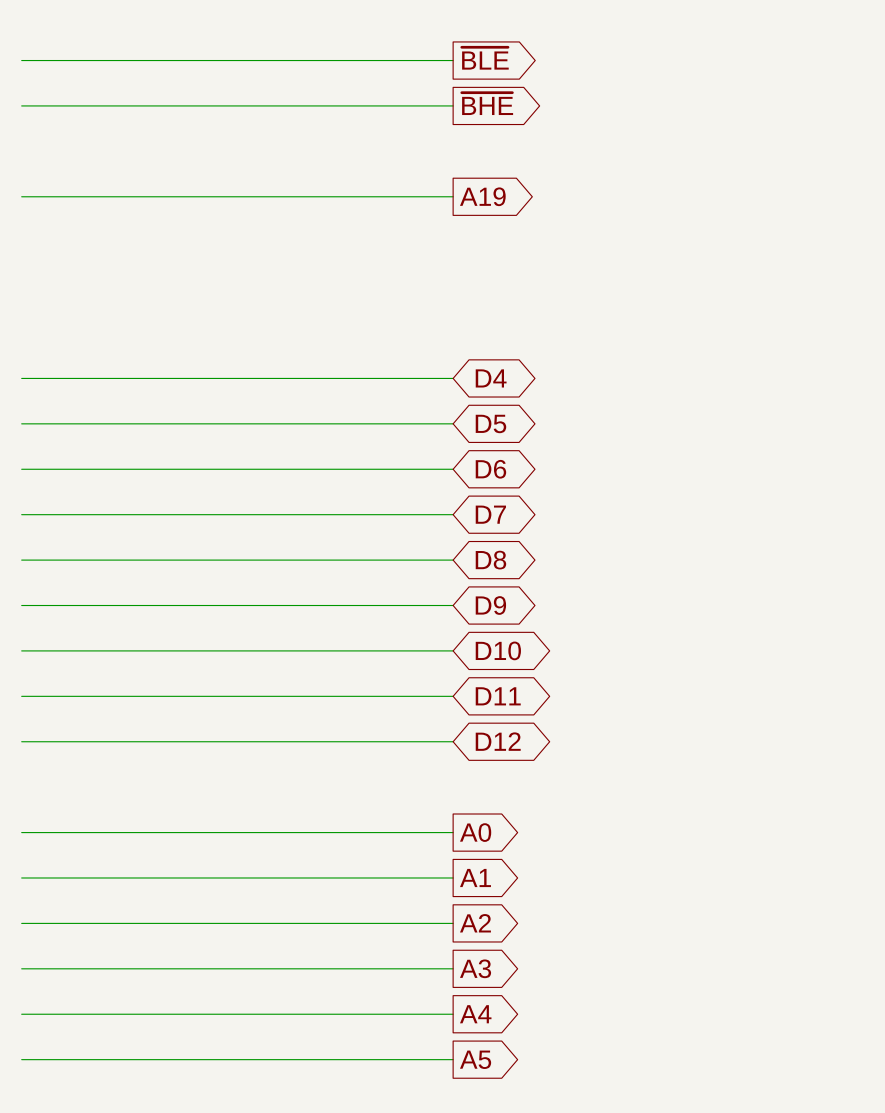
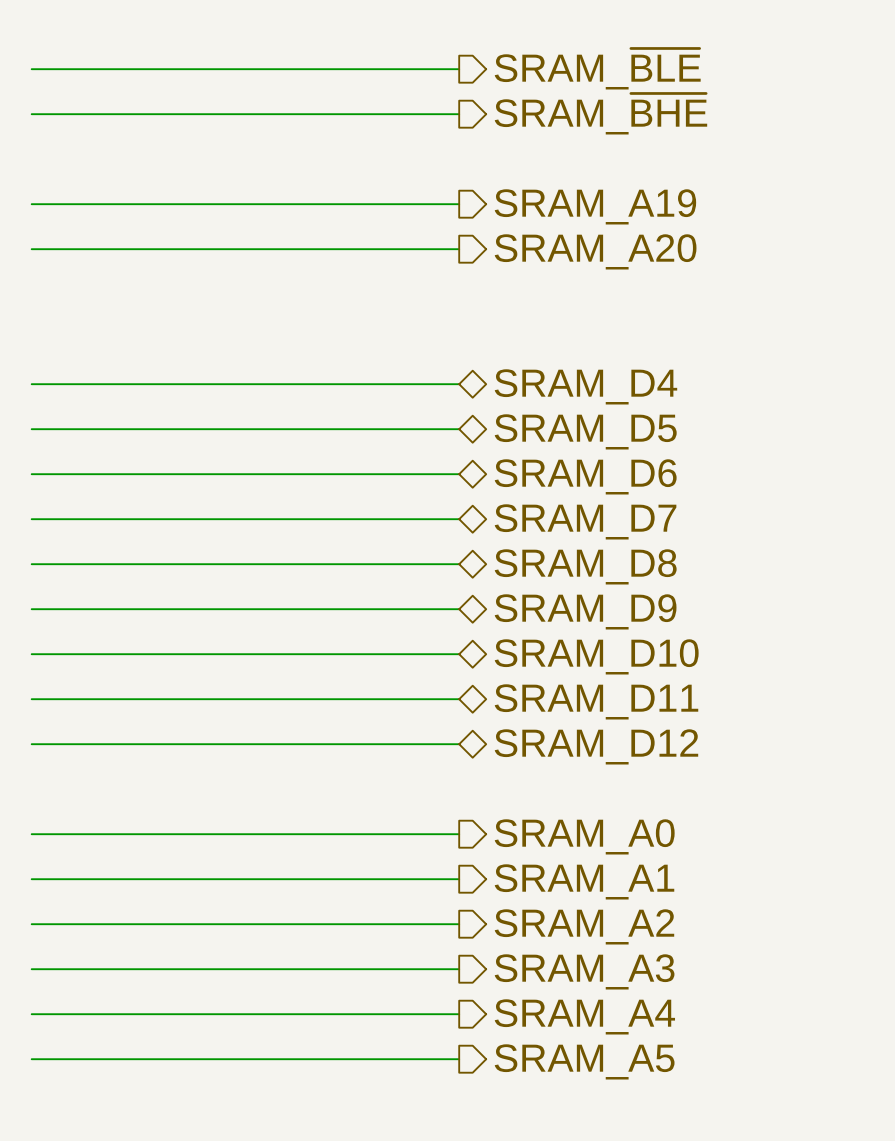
global label: ~{BLE} (485, 58) -> none
hierarchical label: none -> SRAM_~{BLE} (597, 68)
global label: ~{BHE} (487, 103) -> none
hierarchical label: none -> SRAM_~{BHE} (600, 113)
global label: A19 (482, 196) -> none
hierarchical label: none -> SRAM_A19 (595, 206)
wire: none -> (31, 249) (459, 249)
hierarchical label: none -> SRAM_A20 (595, 251)
global label: D4 (491, 378) -> none
hierarchical label: none -> SRAM_D4 (585, 386)
global label: D5 (490, 423) -> none
hierarchical label: none -> SRAM_D5 (585, 431)
global label: D6 (490, 469) -> none
hierarchical label: none -> SRAM_D6 (585, 476)
global label: D7 (490, 514) -> none
hierarchical label: none -> SRAM_D7 (585, 521)
global label: D8 (490, 560) -> none
hierarchical label: none -> SRAM_D8 (585, 566)
global label: D9 (490, 605) -> none
hierarchical label: none -> SRAM_D9 (585, 611)
global label: D10 (498, 650) -> none
hierarchical label: none -> SRAM_D10 (596, 656)
global label: D11 (498, 696) -> none
hierarchical label: none -> SRAM_D11 (596, 701)
global label: D12 (498, 741) -> none
hierarchical label: none -> SRAM_D12 (596, 746)
global label: A0 (475, 832) -> none
hierarchical label: none -> SRAM_A0 (584, 836)
global label: A1 (475, 877) -> none
hierarchical label: none -> SRAM_A1 (584, 881)
global label: A2 (475, 923) -> none
hierarchical label: none -> SRAM_A2 (584, 926)
global label: A3 (475, 968) -> none
hierarchical label: none -> SRAM_A3 (584, 971)
global label: A4 (475, 1014) -> none
hierarchical label: none -> SRAM_A4 (584, 1016)
global label: A5 (475, 1059) -> none
hierarchical label: none -> SRAM_A5 (584, 1061)

